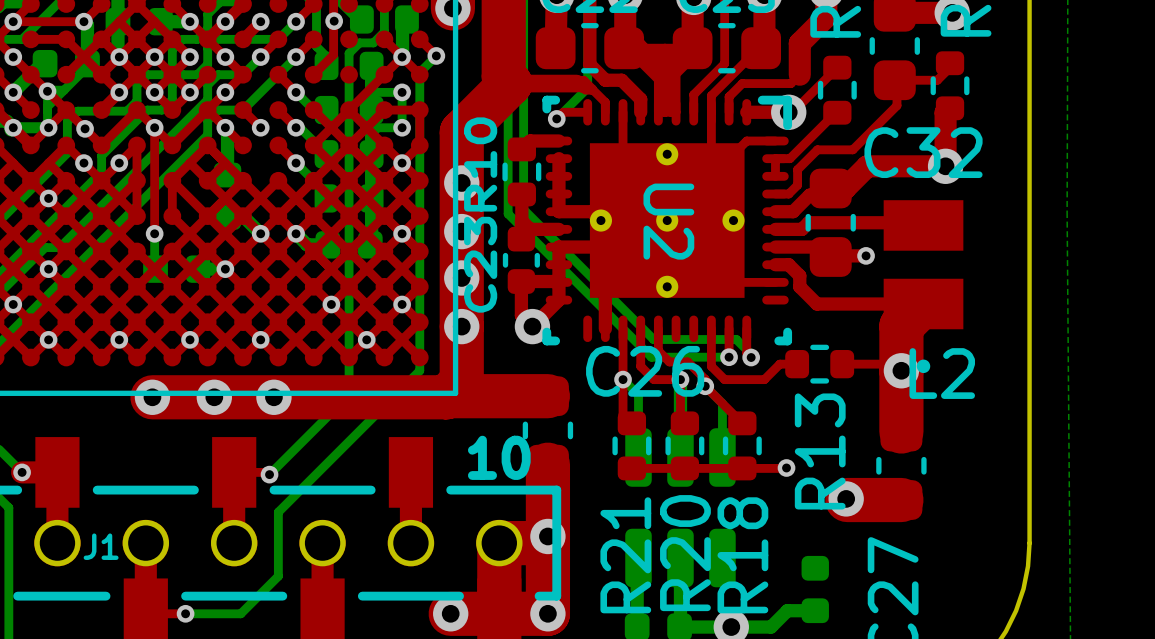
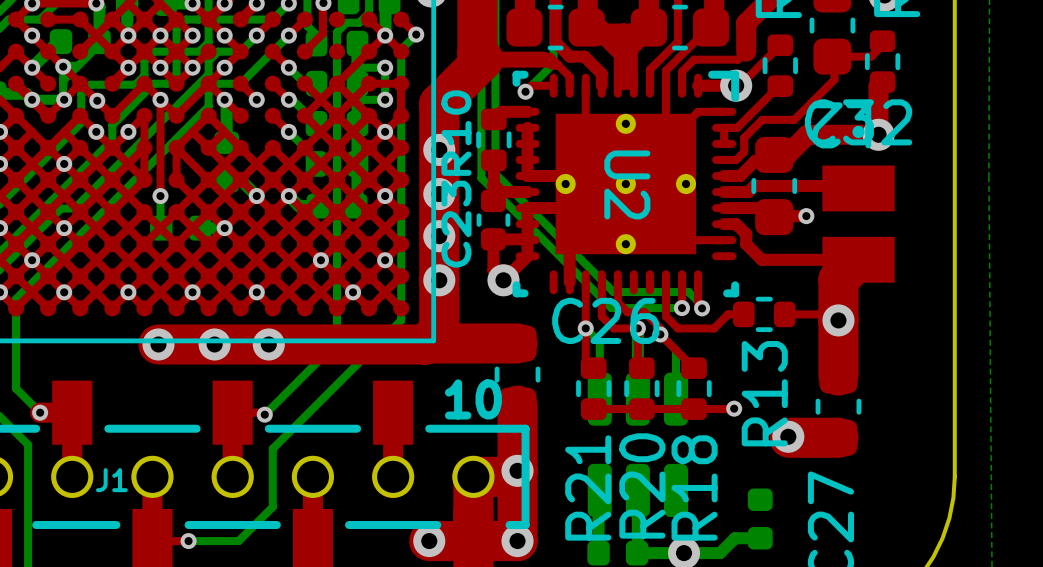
L2 rotation: 0° (923, 286) -> 180° (858, 204)

